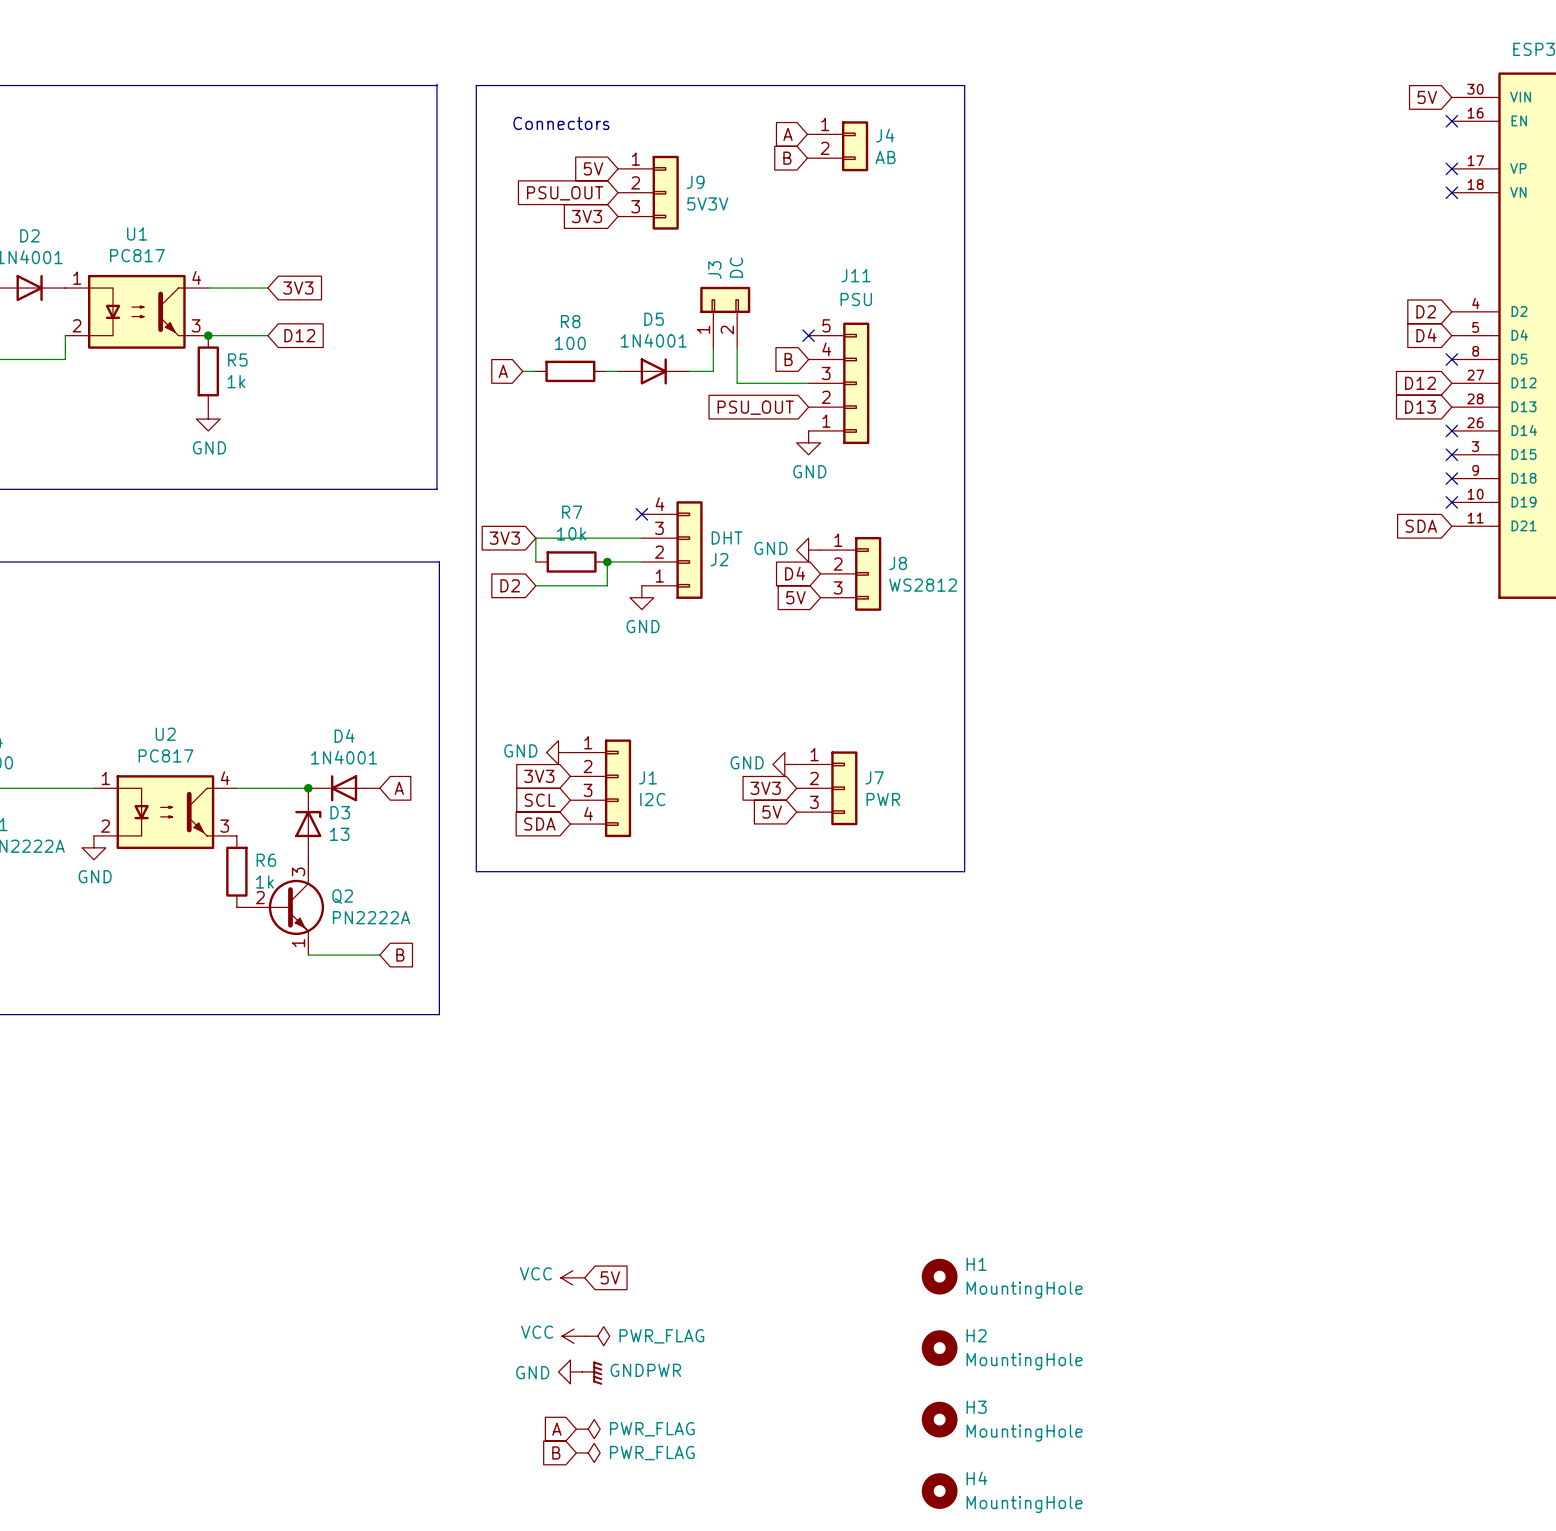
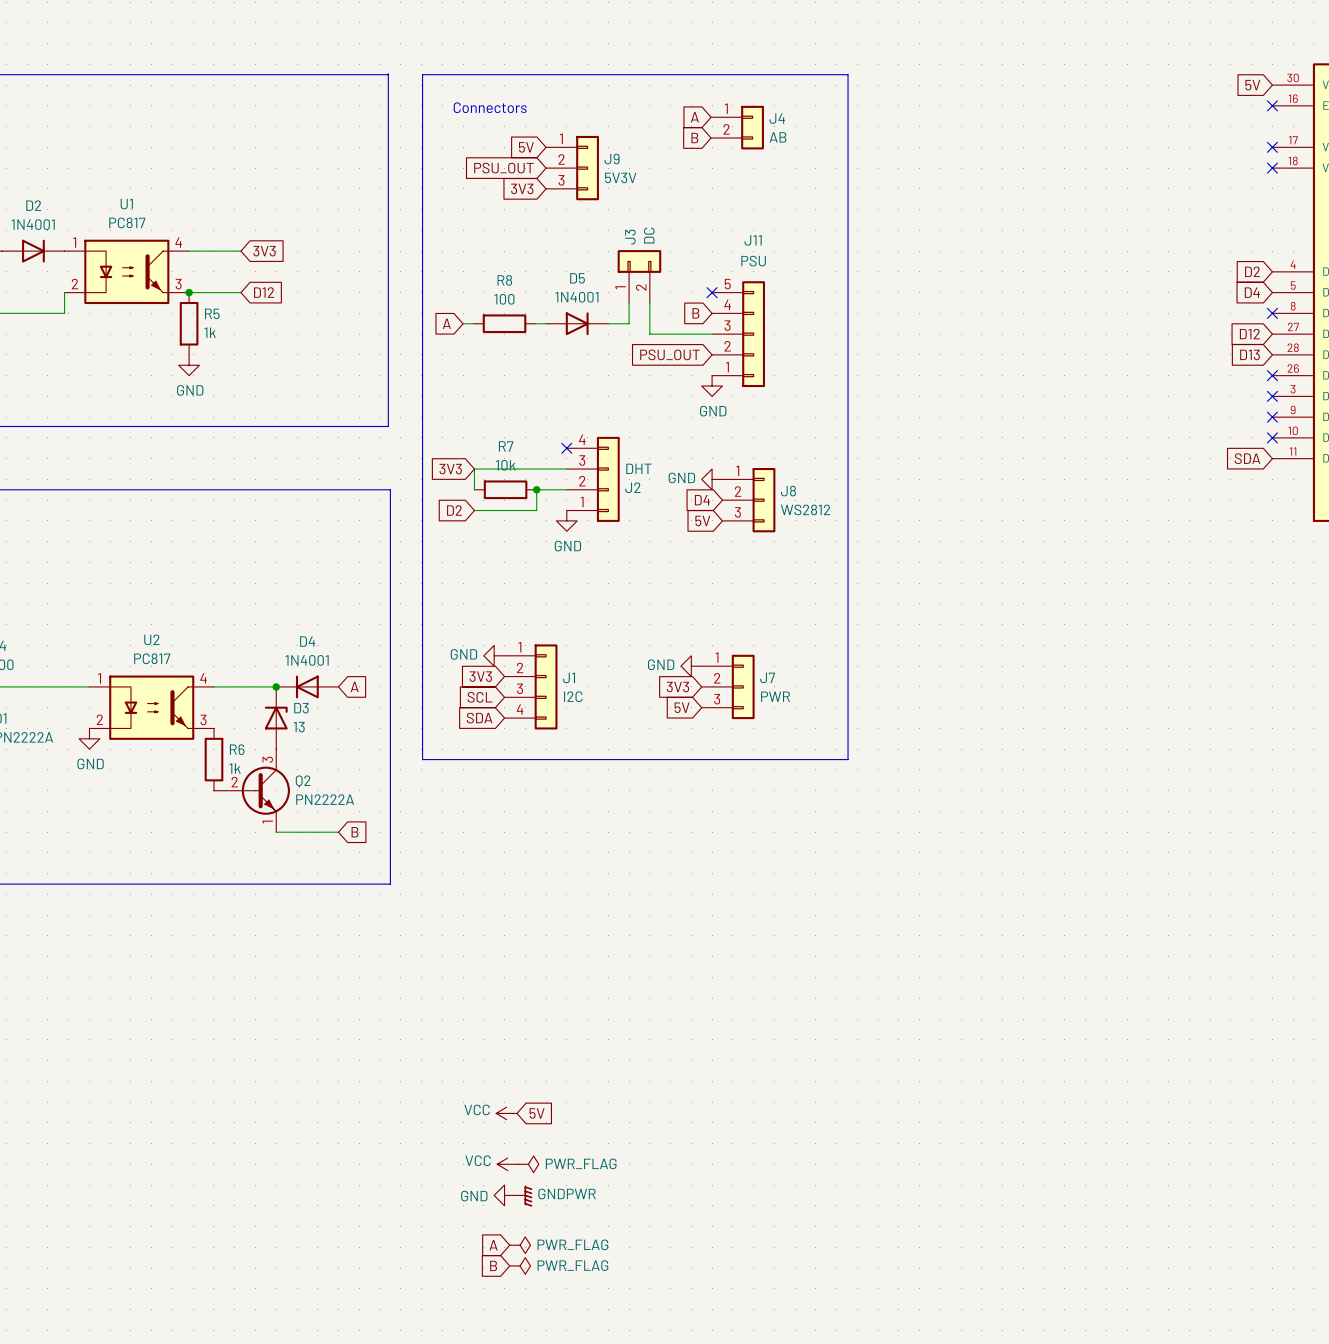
H1: MountingHole (939, 1276) -> none
H2: MountingHole (939, 1348) -> none
H3: MountingHole (939, 1419) -> none
H4: MountingHole (939, 1491) -> none

